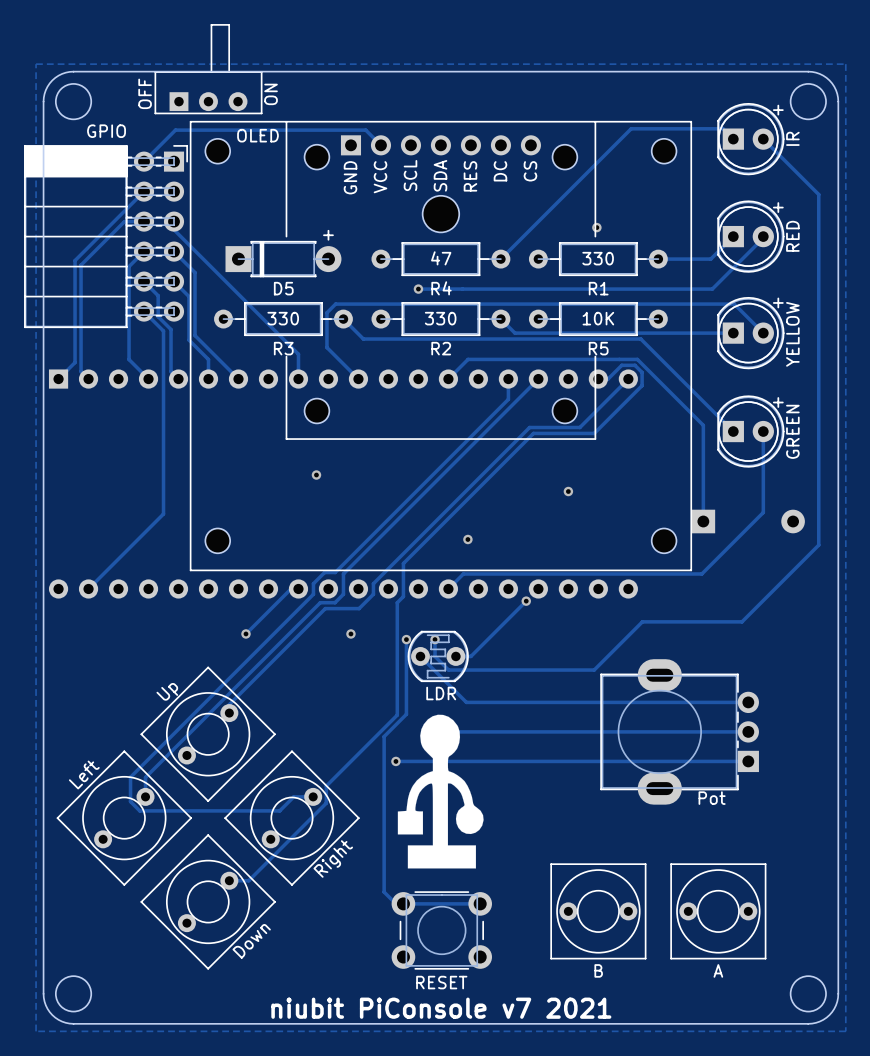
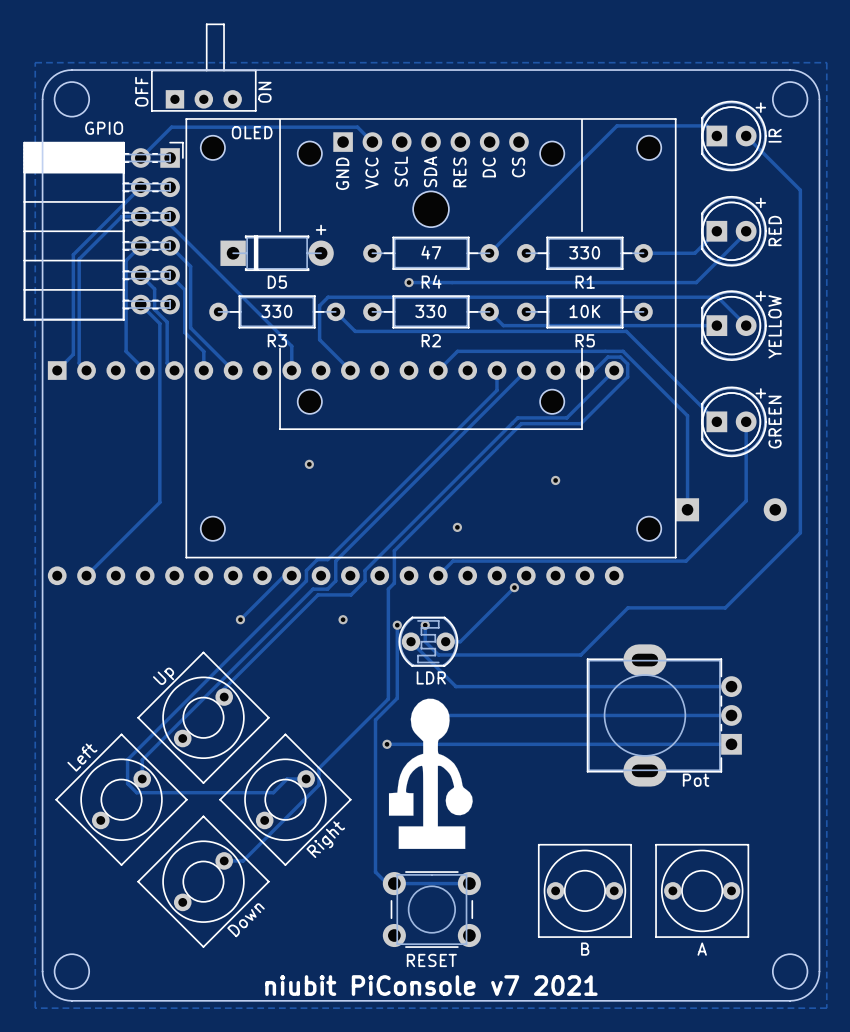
via: (596, 227) -> none

